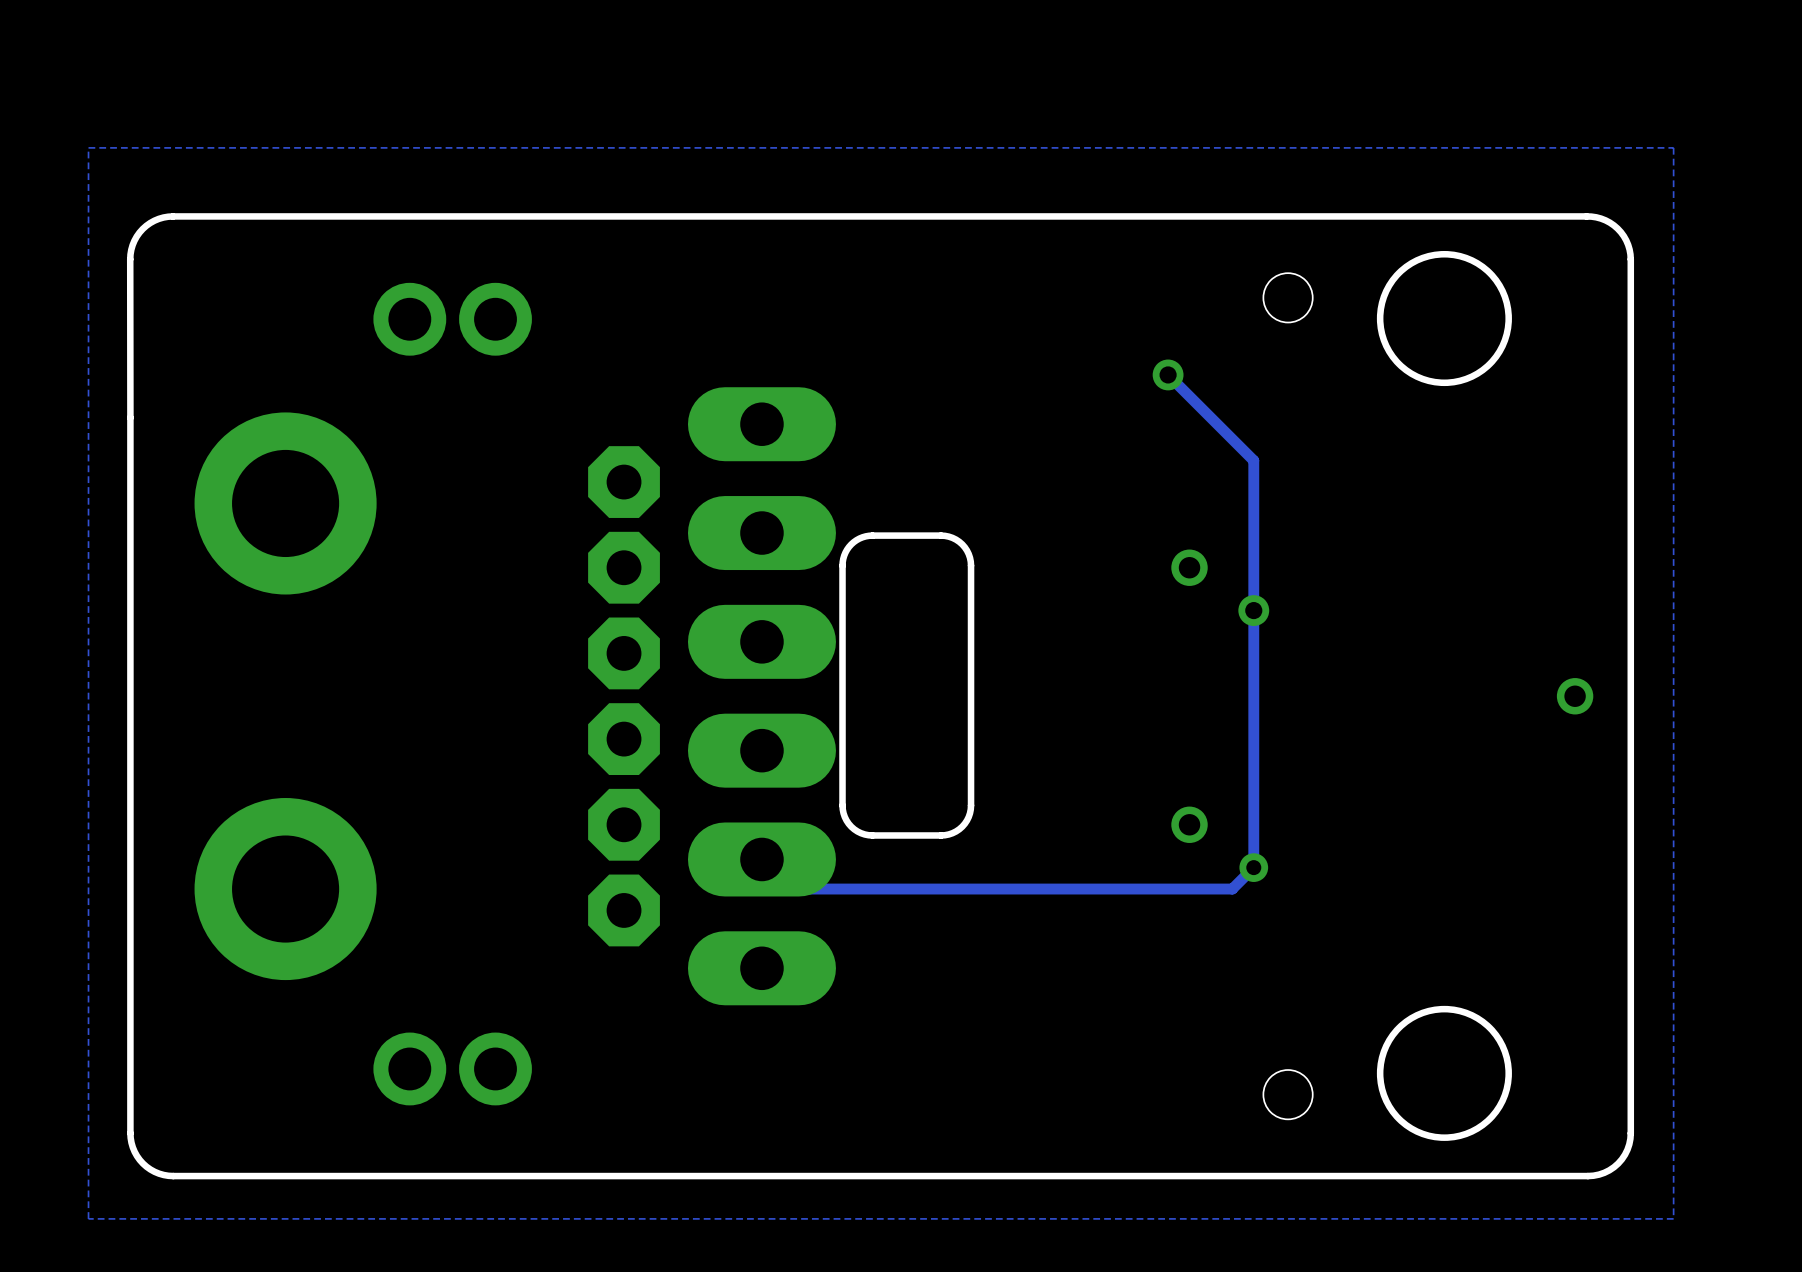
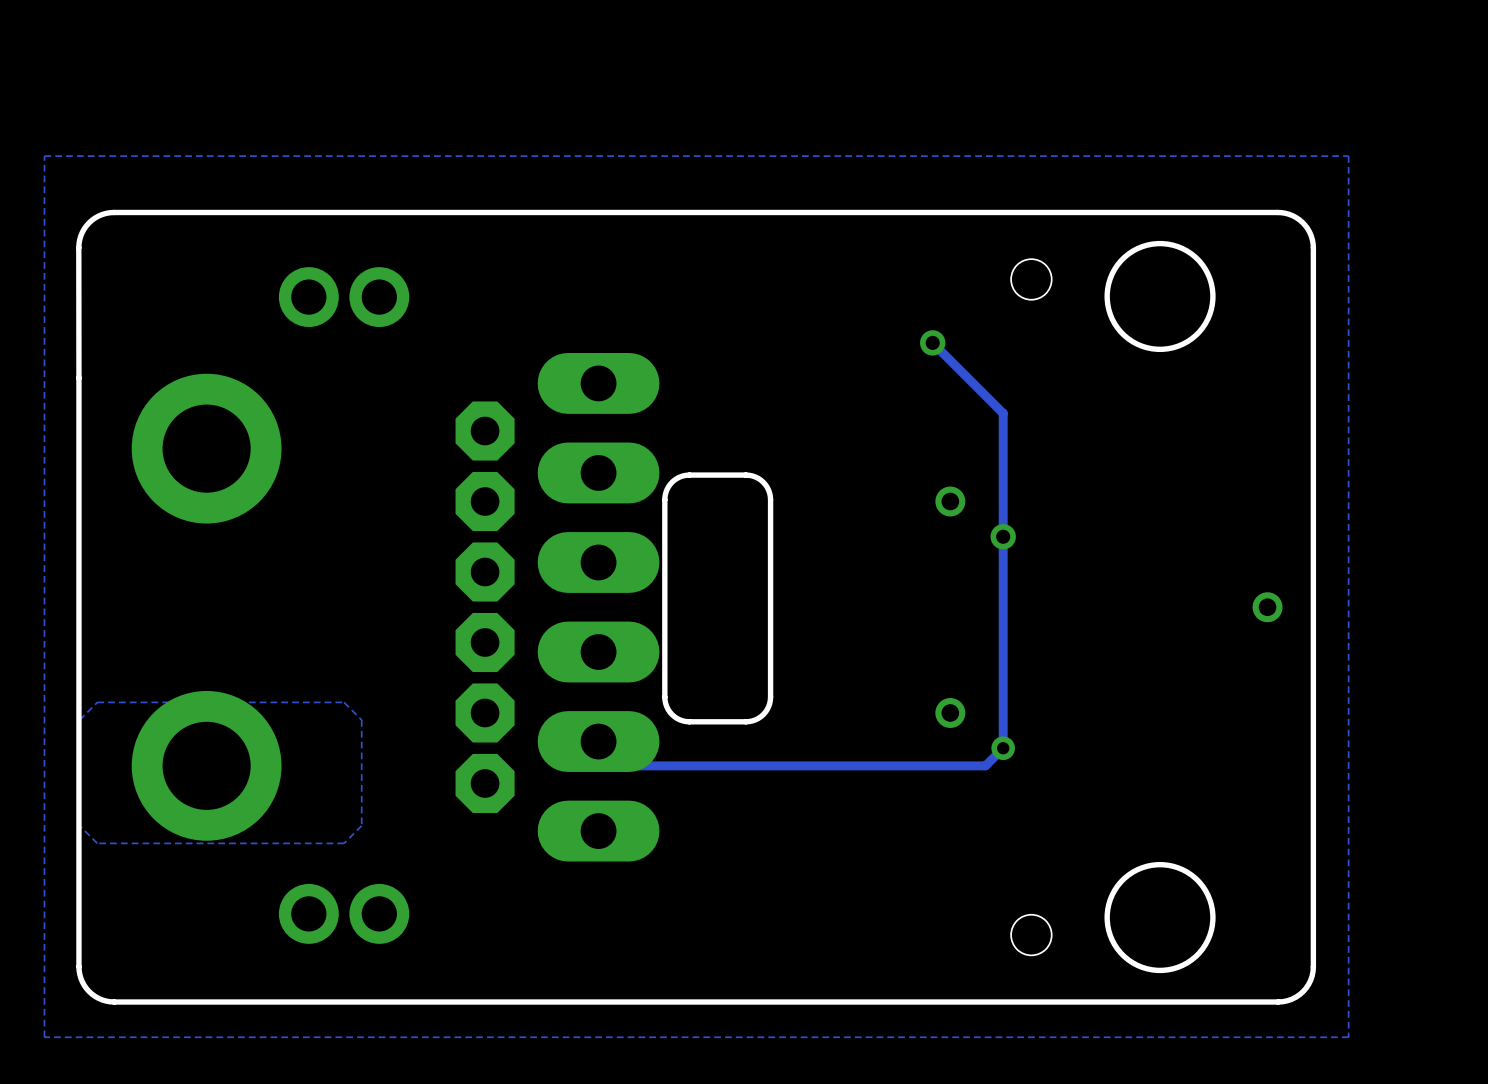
zone outline: none -> (344, 702) (97, 702) (79, 720) (79, 825) (97, 843) (344, 843) (361, 825) (361, 720) (344, 702)

